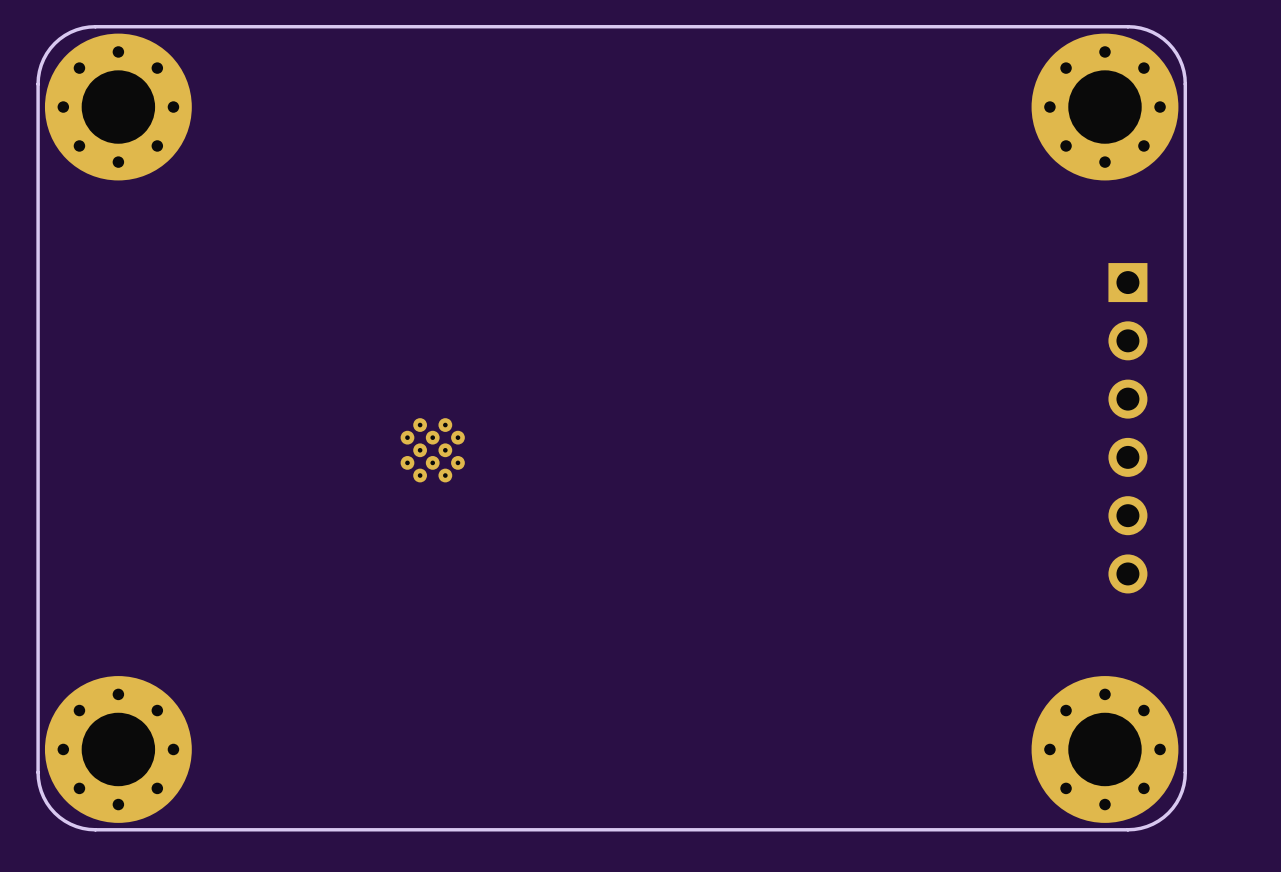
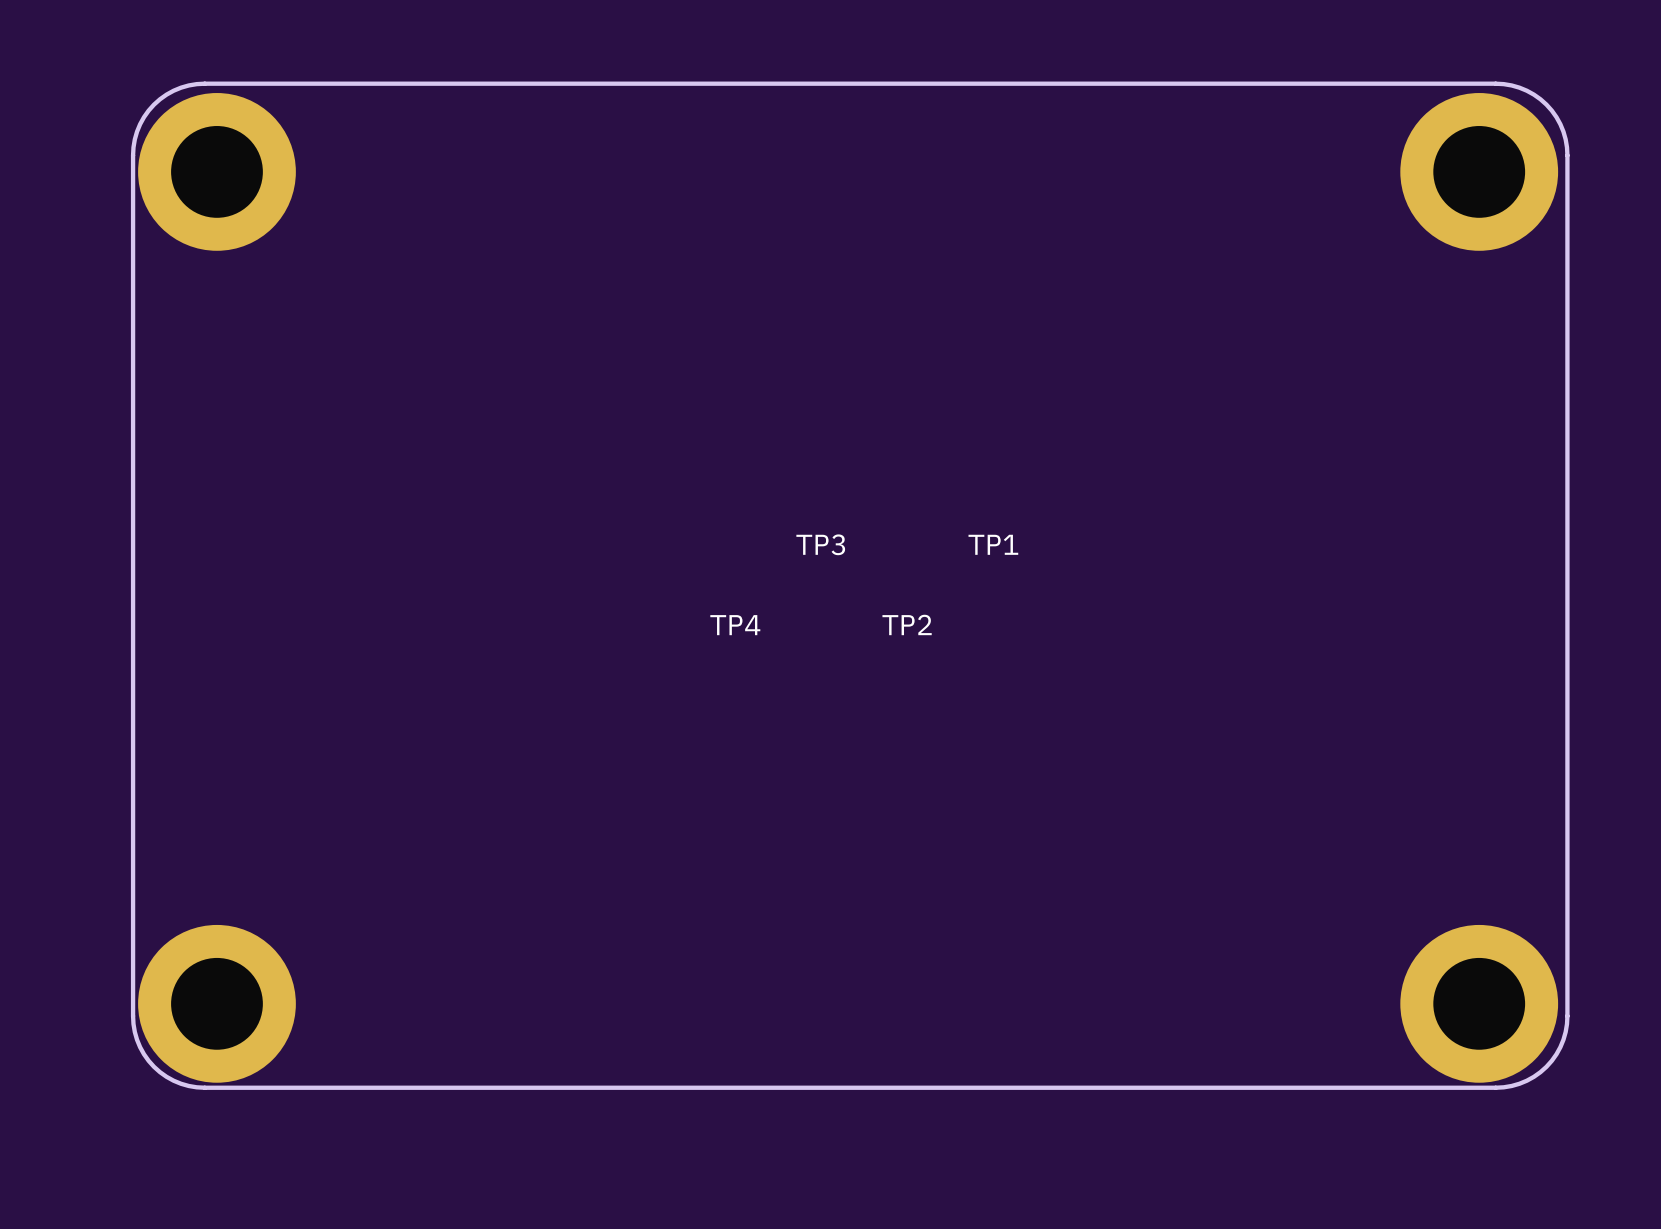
part footprint: [44, 33, 192, 181] -> [138, 93, 296, 251]
part footprint: [1031, 33, 1179, 181] -> [1400, 93, 1559, 251]
TP3: none -> (820, 544)
TP1: none -> (993, 544)
part: (1127, 428) -> none
part: (432, 450) -> none
TP4: none -> (735, 625)
TP2: none -> (907, 624)
part footprint: [44, 676, 192, 823] -> [138, 924, 296, 1083]
part footprint: [1031, 676, 1179, 823] -> [1400, 924, 1559, 1083]

